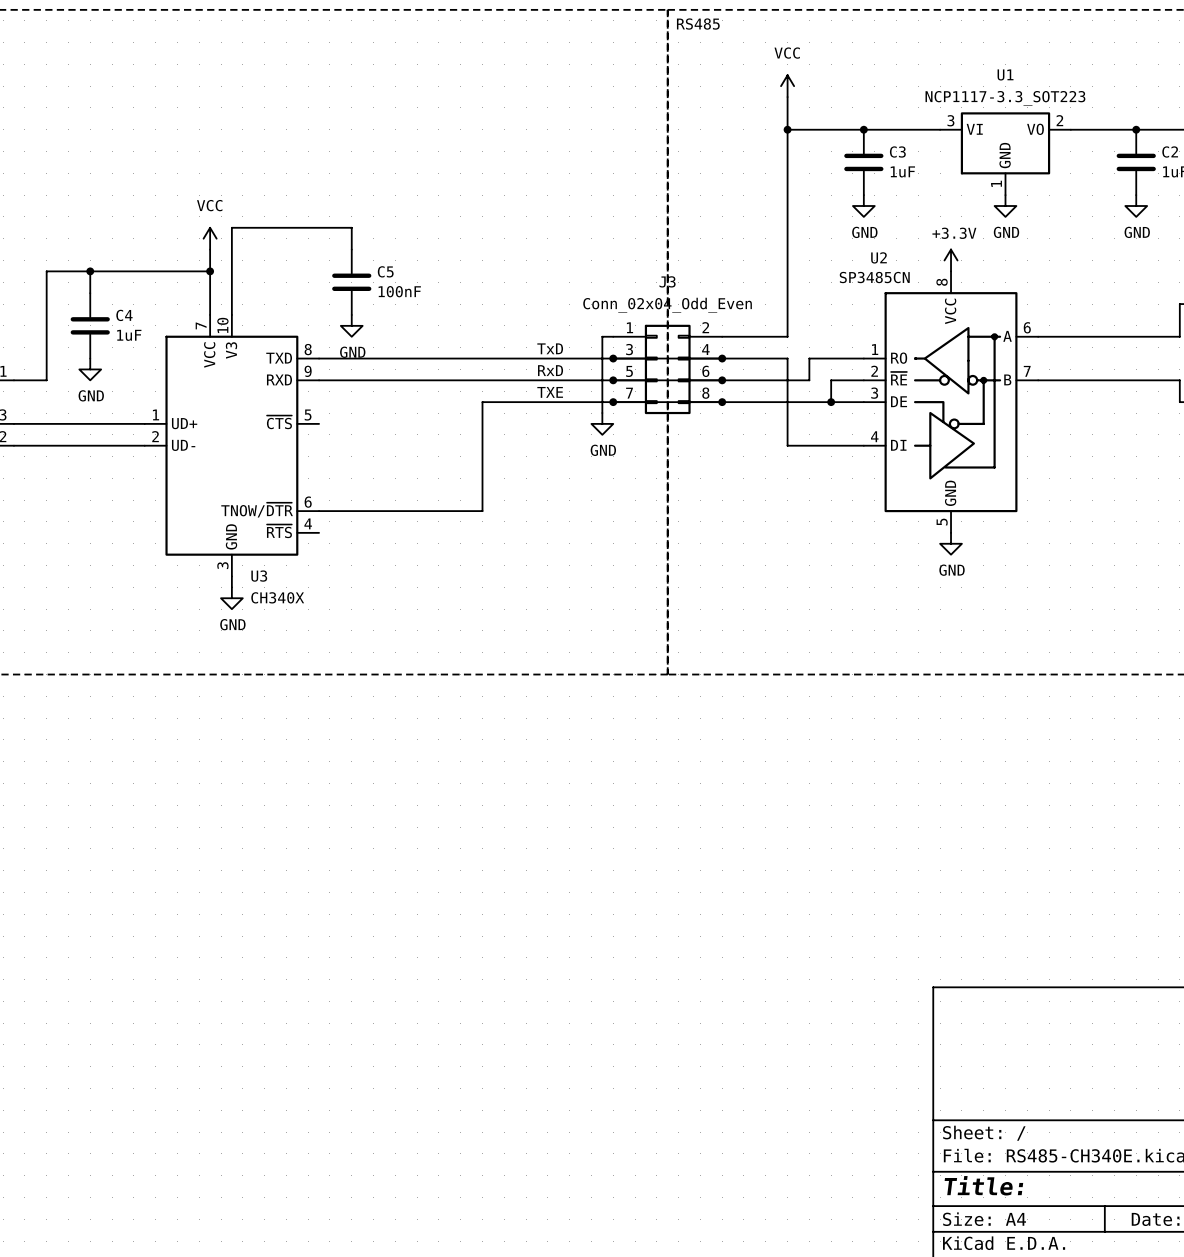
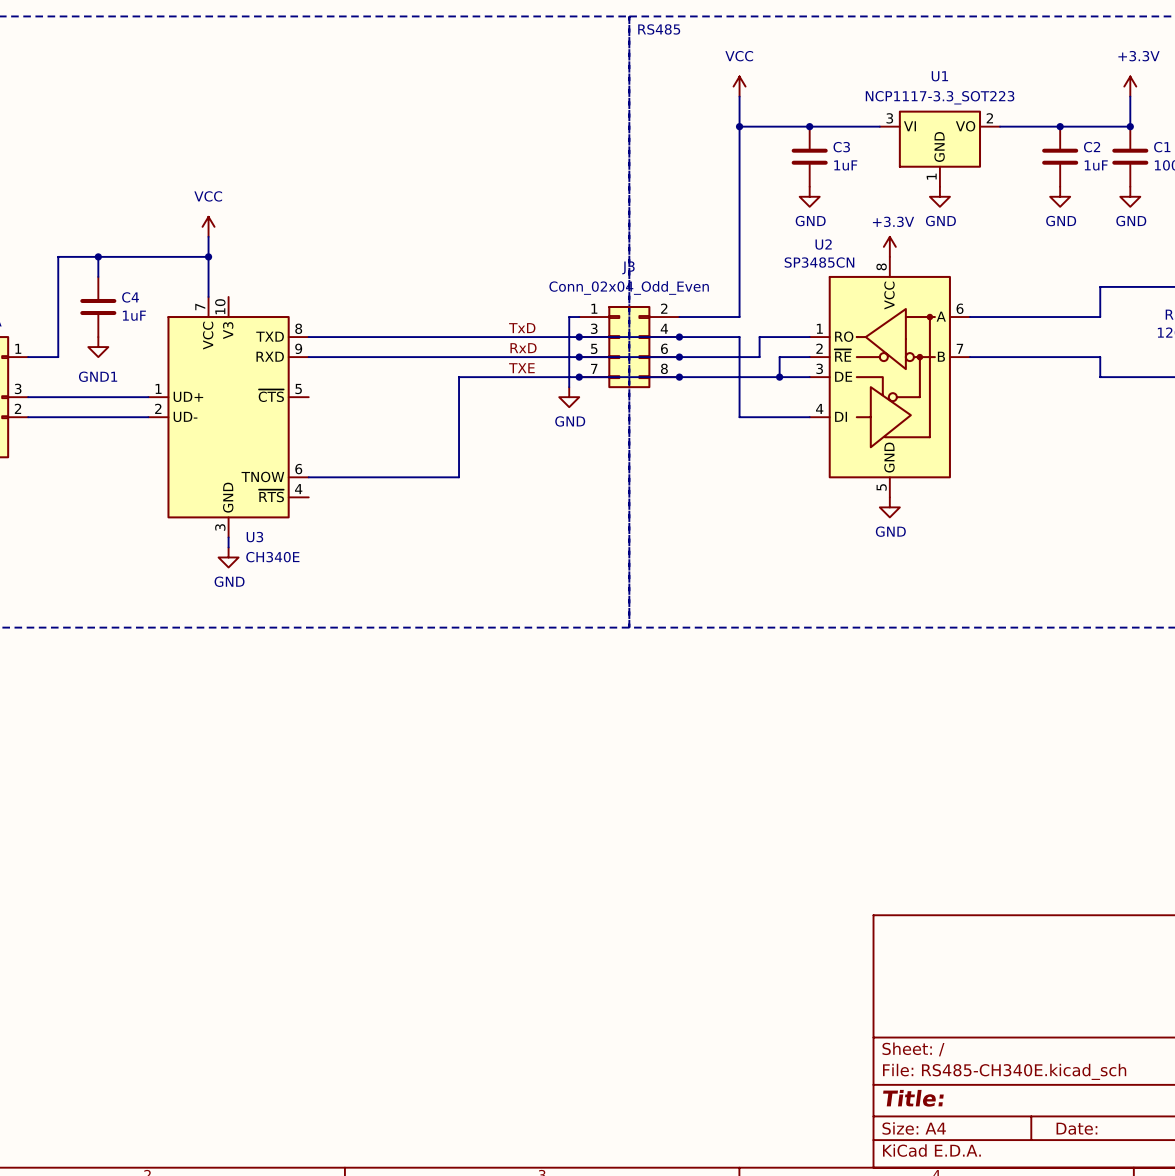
wire: (351, 249) (351, 227) (231, 227) (231, 314) -> none
C5: 100nF (351, 282) -> none
power symbol: GND (351, 325) -> none
power symbol: GND (90, 369) -> GND1 (98, 347)
U3 pin name: TNOW/~{DTR} (257, 510) -> TNOW (262, 476)
U3 value: CH340X (277, 597) -> CH340E (272, 557)

